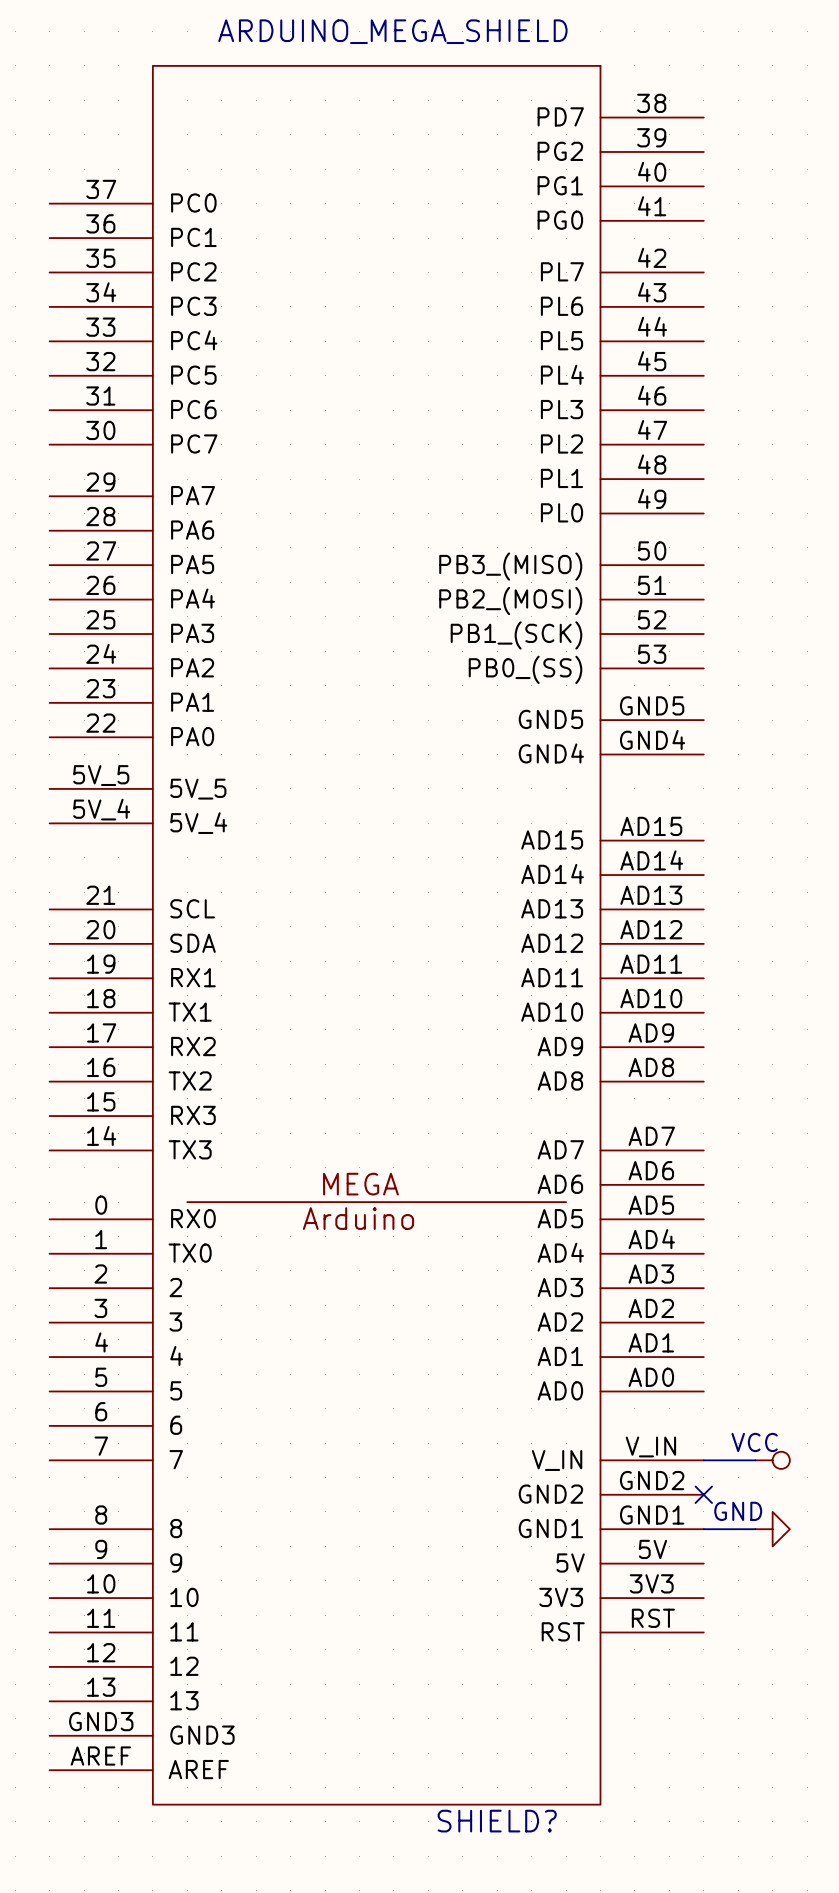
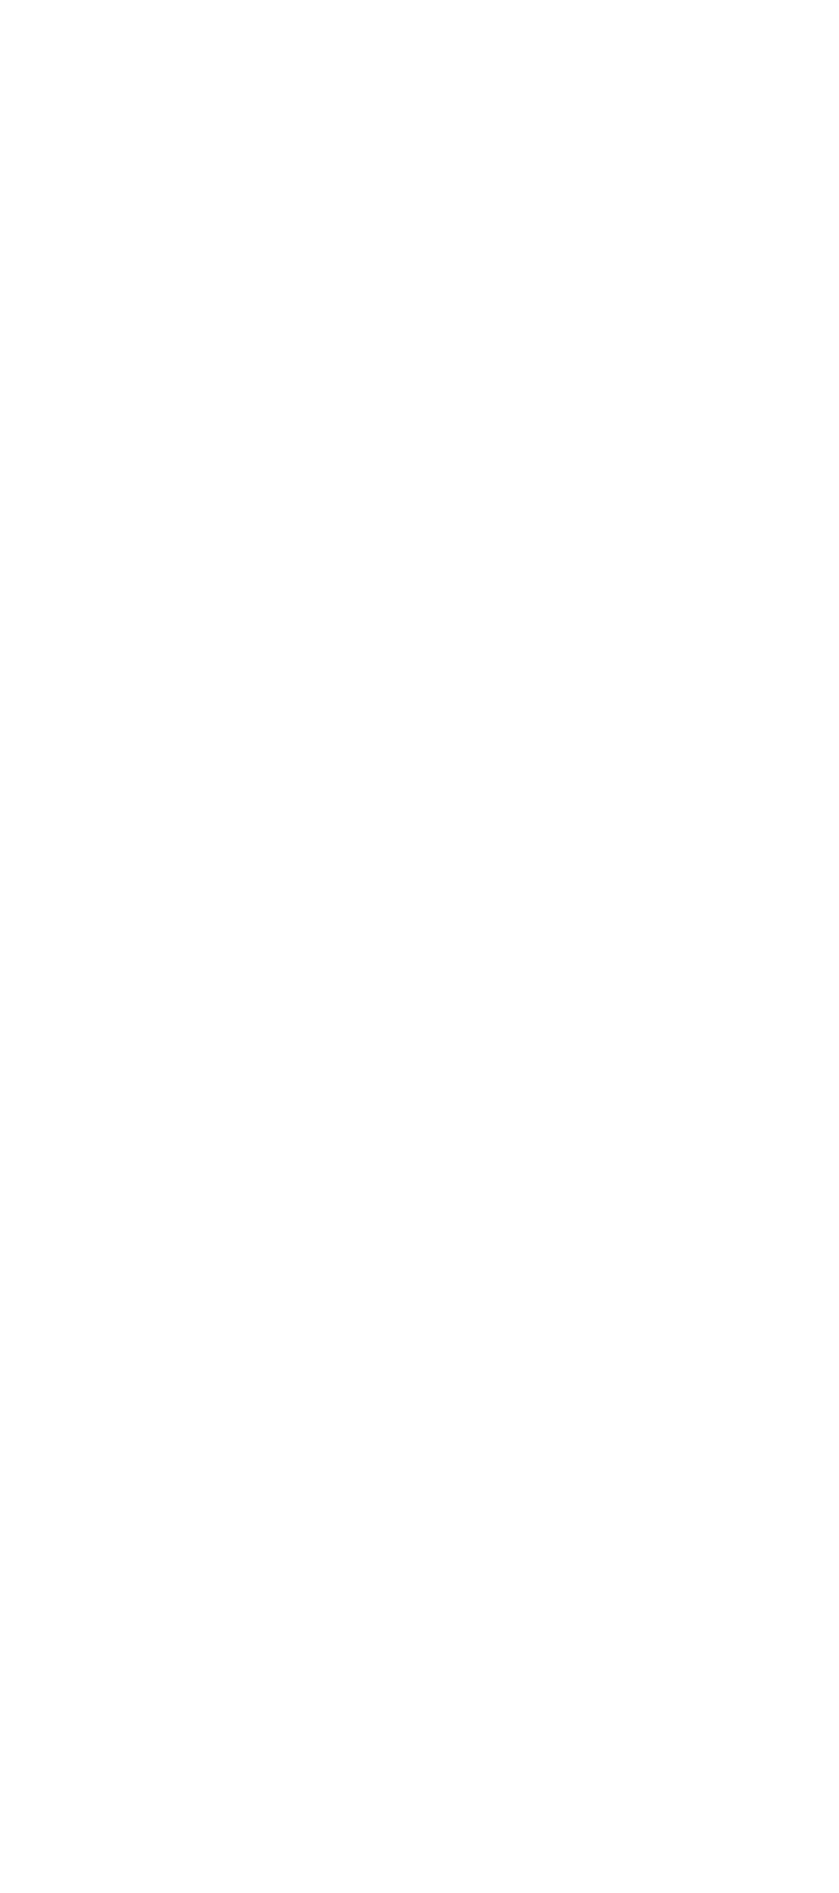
SHIELD?: ARDUINO_MEGA_SHIELD (376, 935) -> none
wire: (703, 1460) (755, 1460) -> none
power symbol: VCC (772, 1460) -> none
no-connect mark: (703, 1494) -> none
wire: (703, 1529) (755, 1529) -> none
power symbol: GND (772, 1529) -> none

